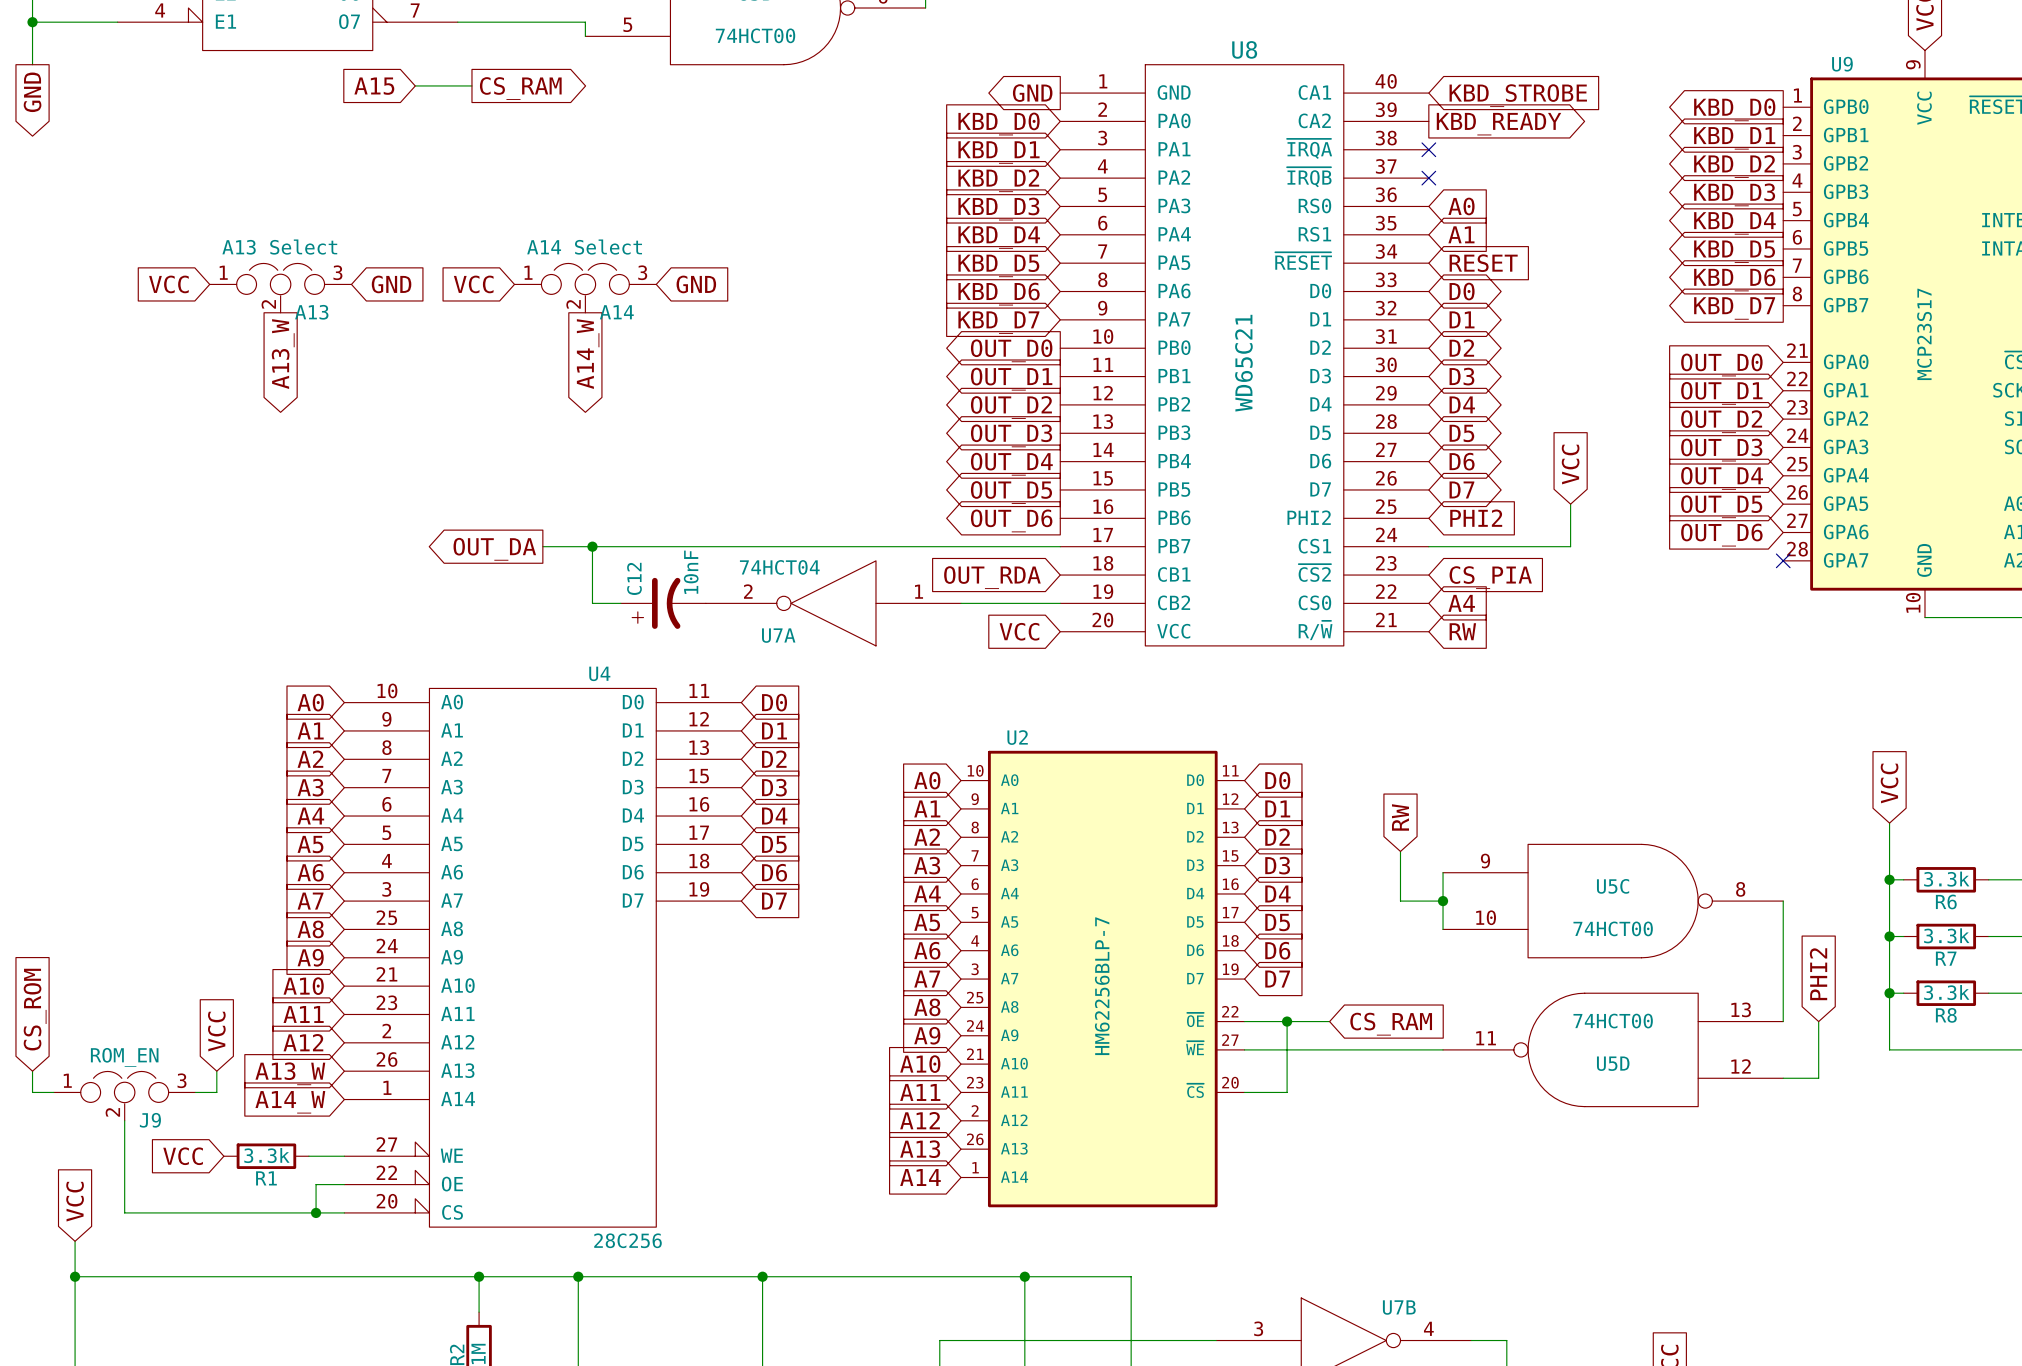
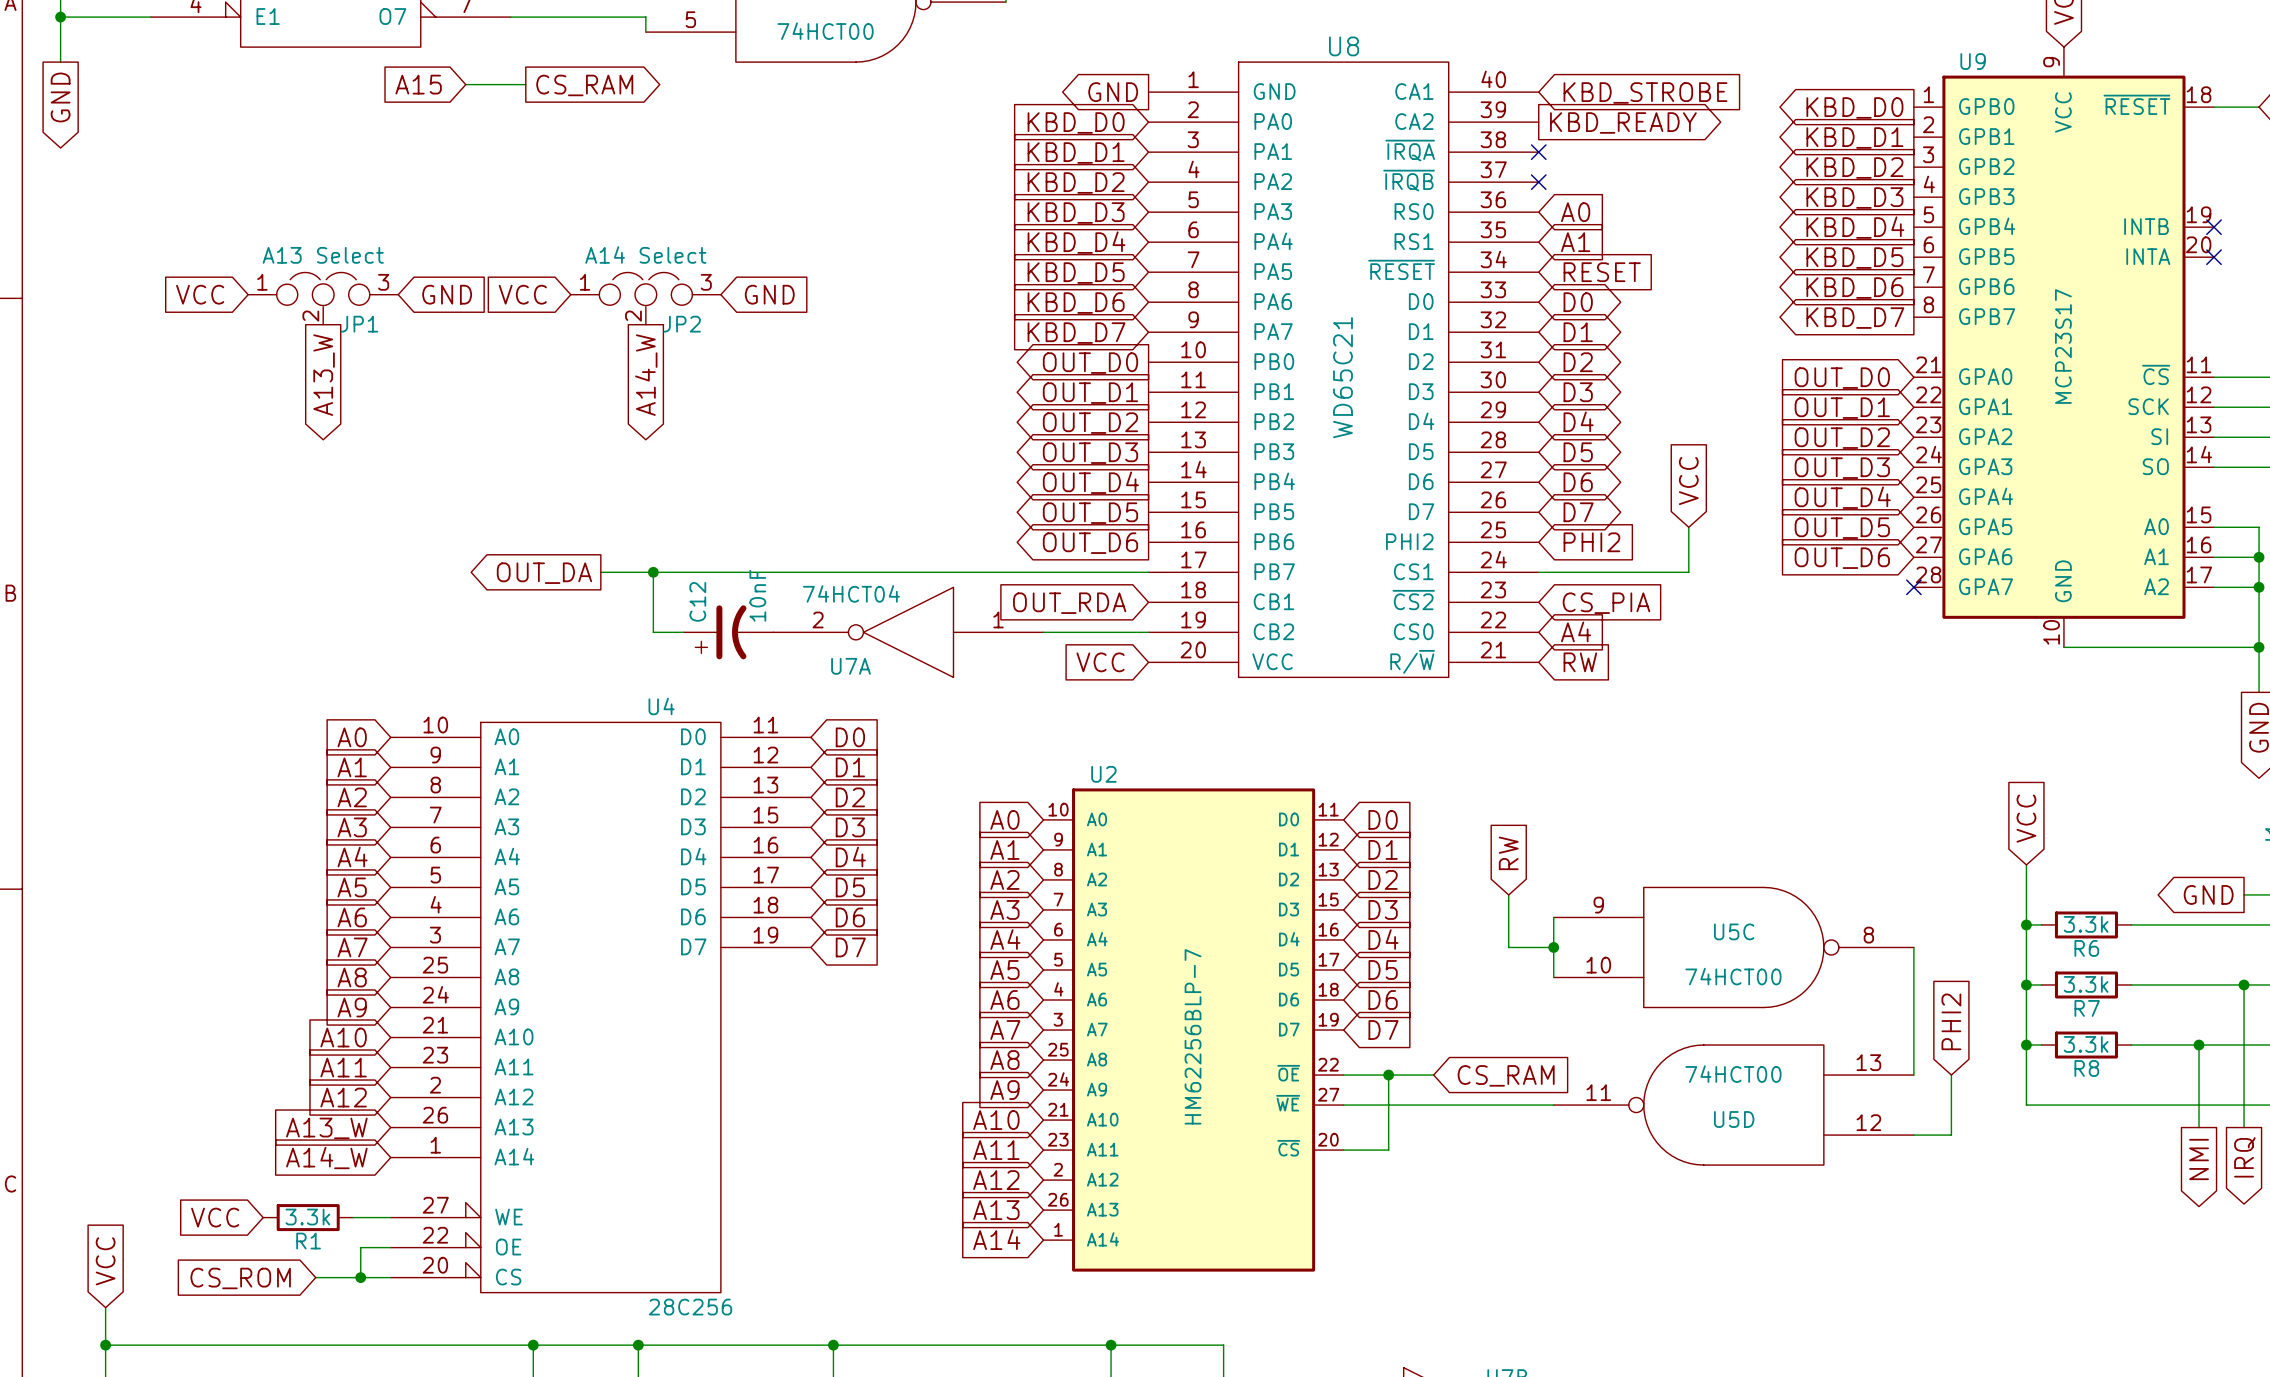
A13 name: A13 (311, 312) -> JP1 (359, 324)
A14 name: A14 (616, 312) -> JP2 (682, 324)
global label: CS_ROM (35, 1009) -> none
global label: VCC (216, 1031) -> none
wire: (32, 1071) (32, 1092) (53, 1092) -> none
wire: (216, 1071) (216, 1092) (195, 1092) -> none
J9: ROM_EN (124, 1096) -> none
wire: (124, 1120) (124, 1212) (273, 1212) -> none
global label: none -> CS_ROM (240, 1278)

